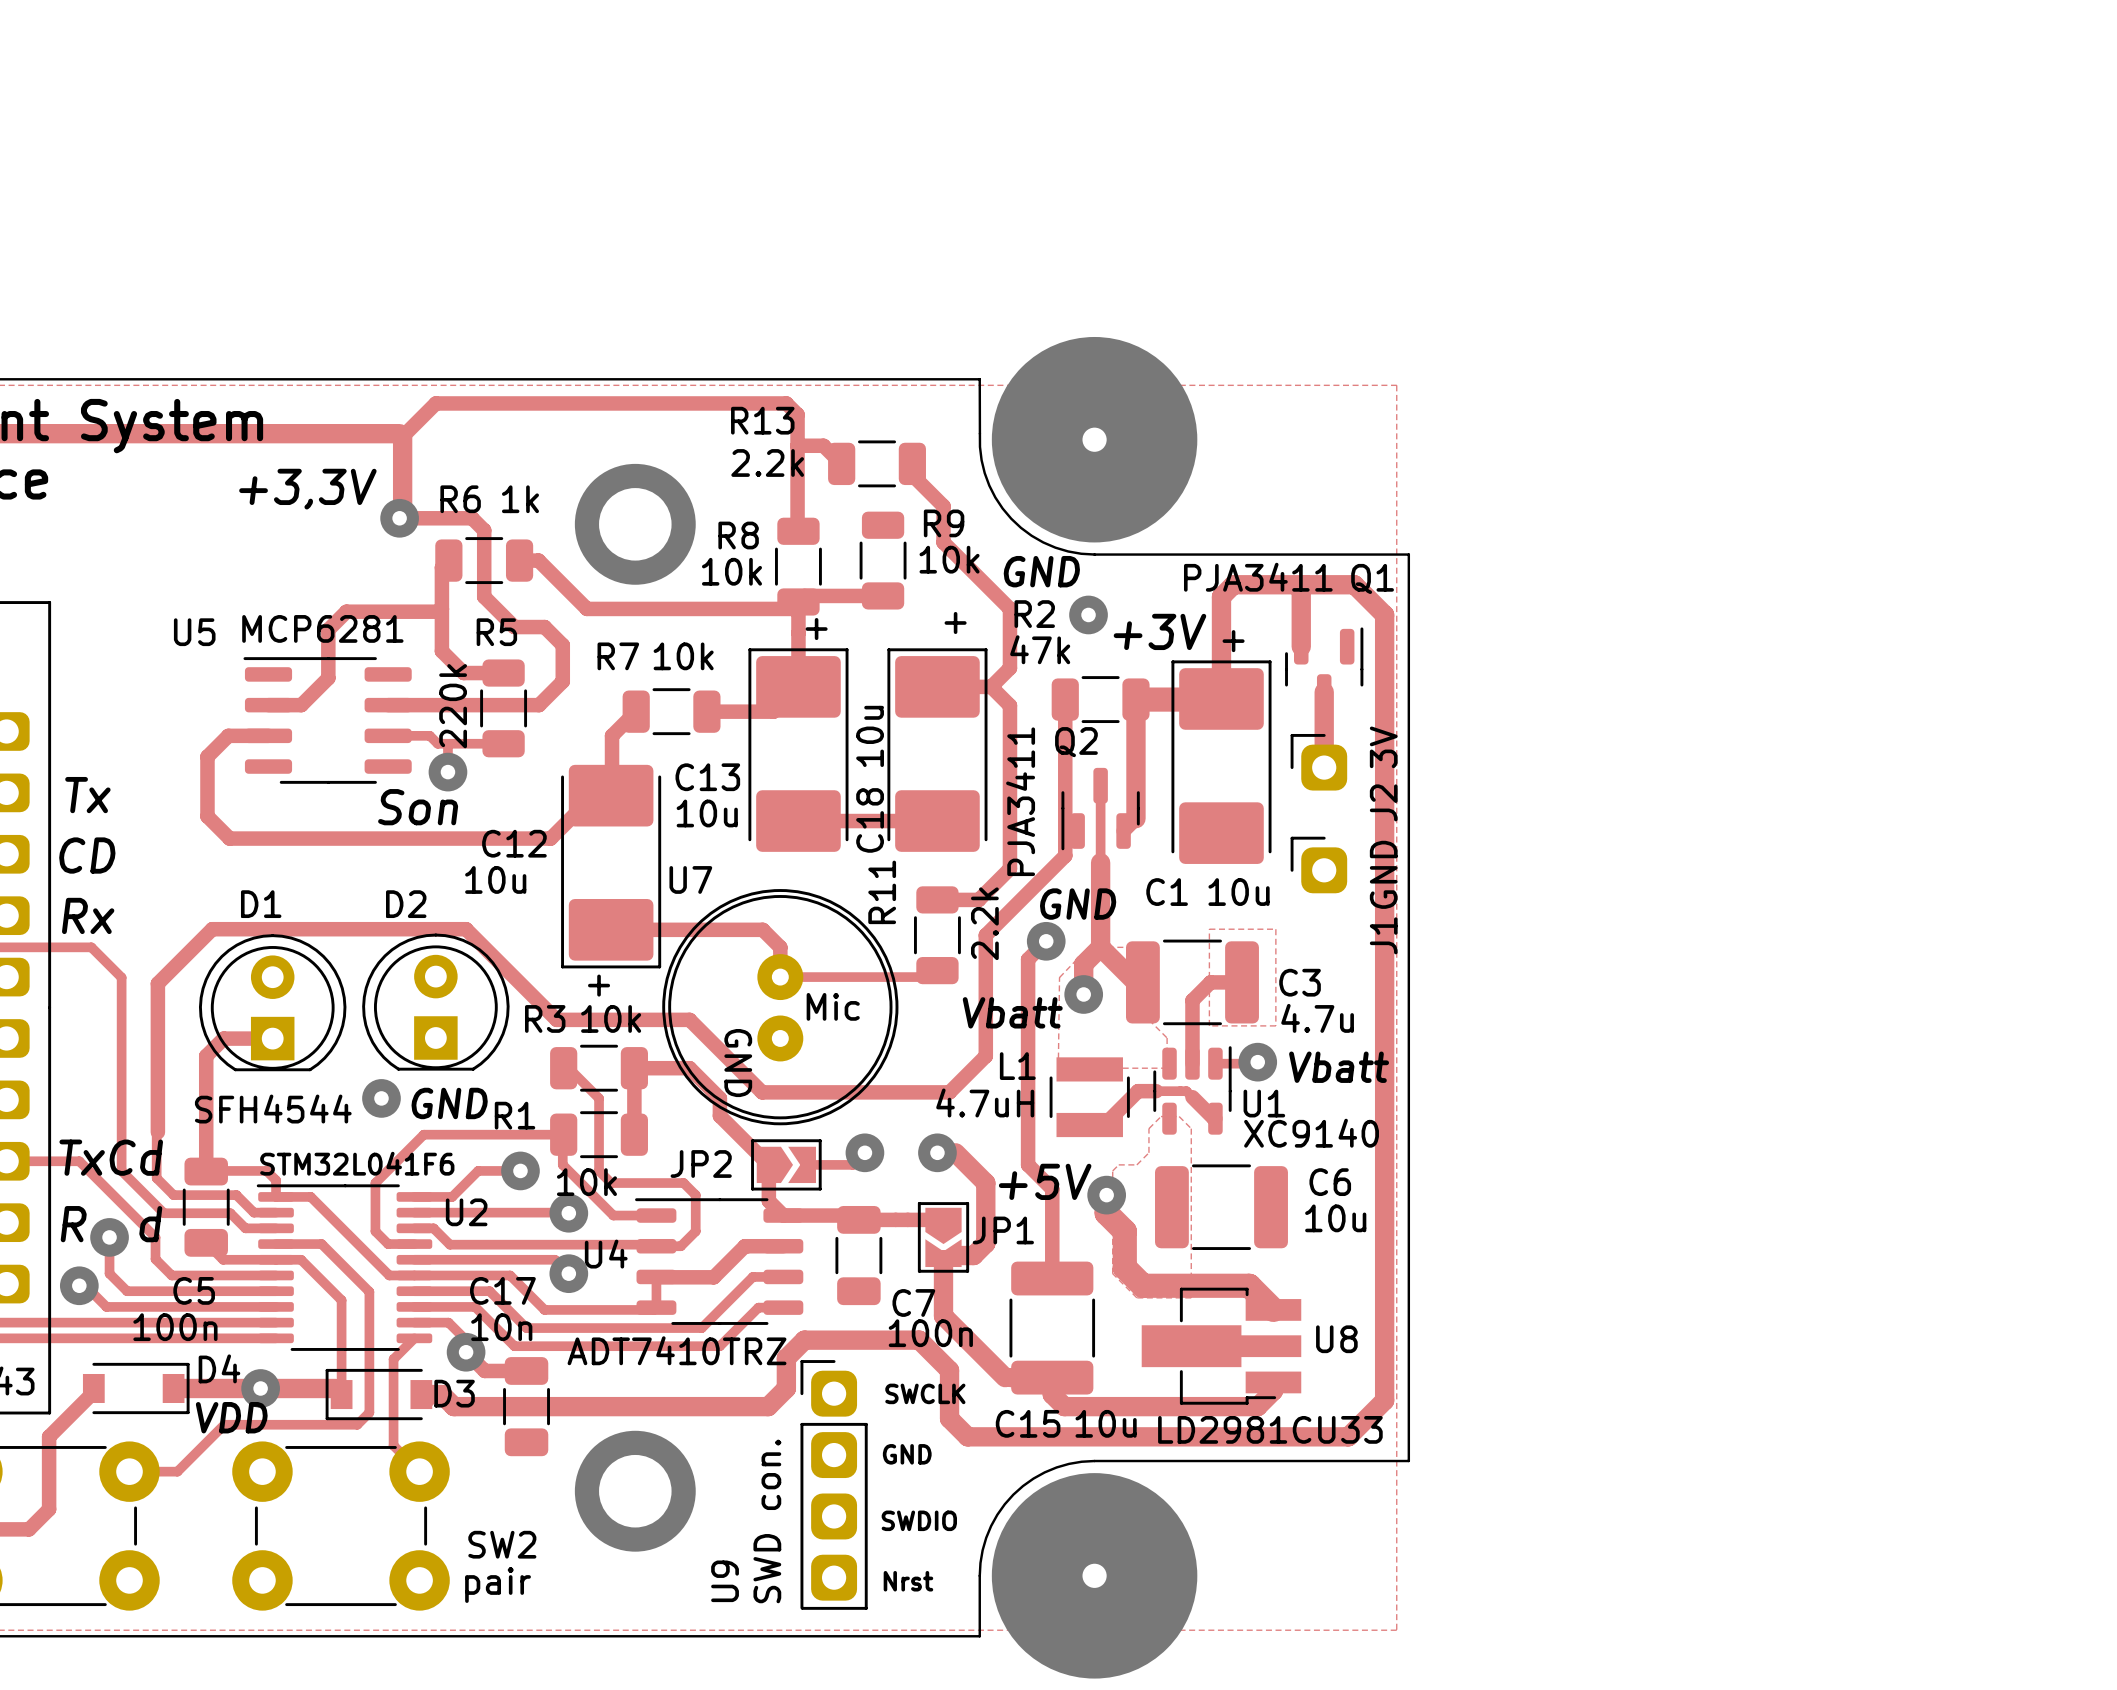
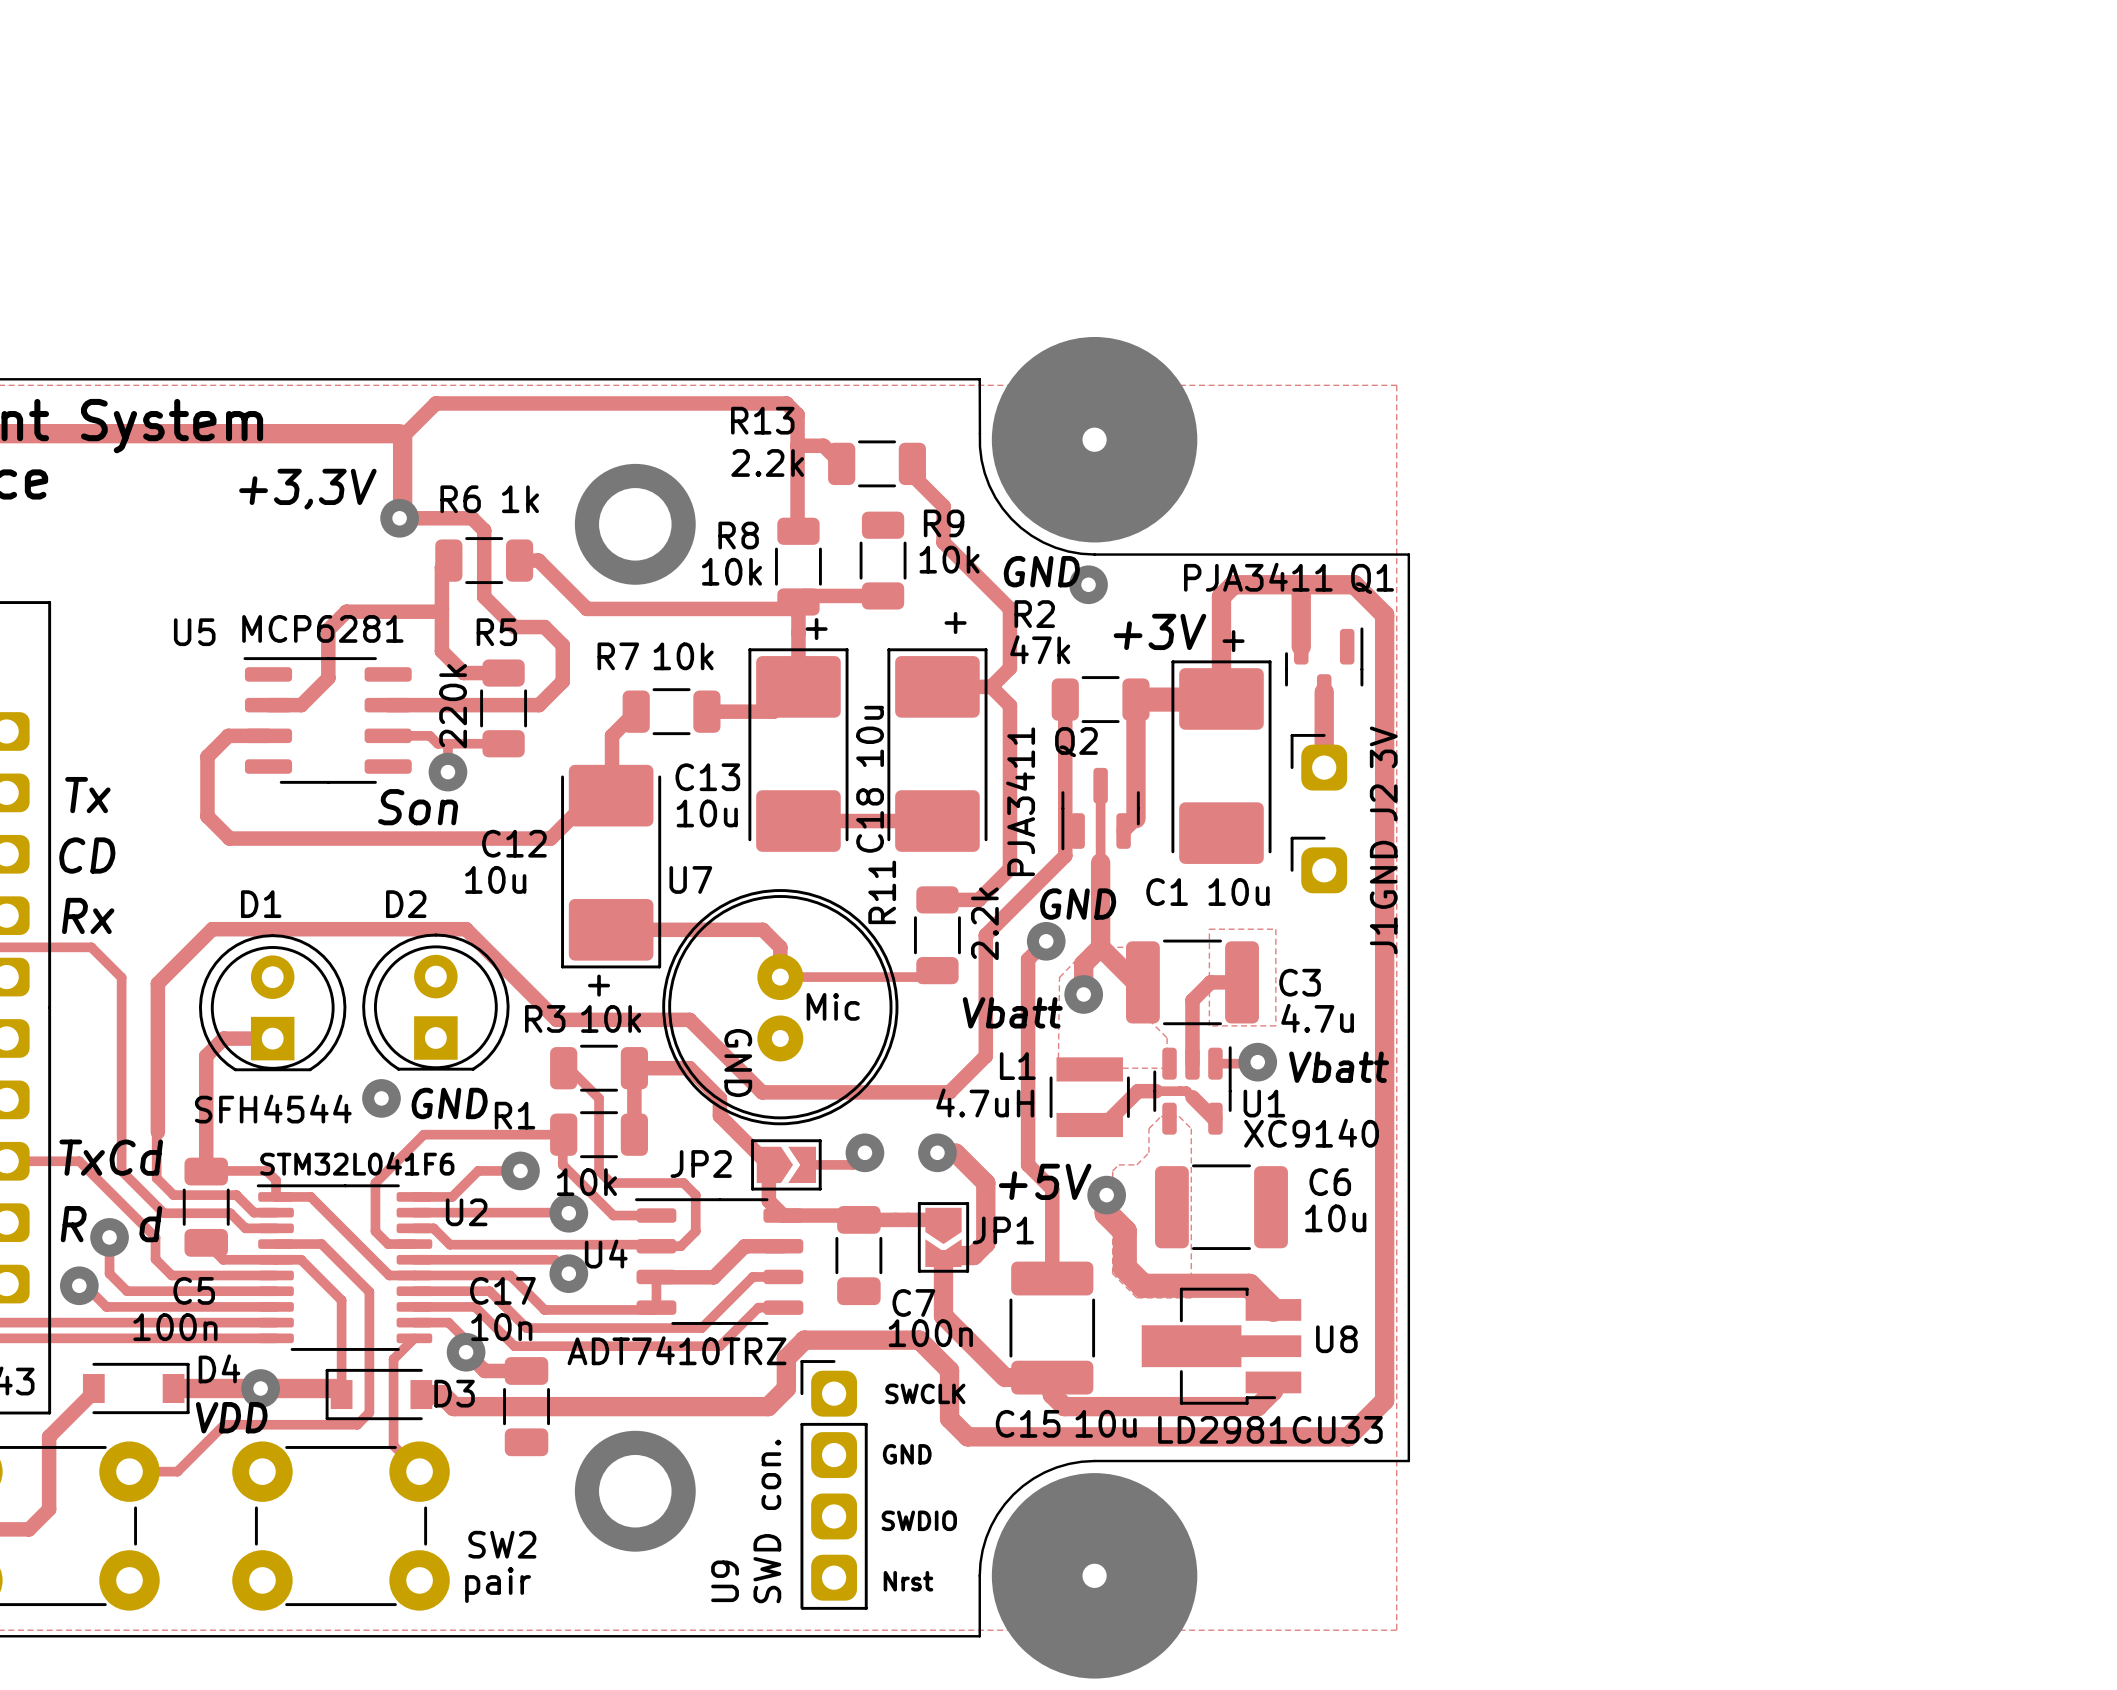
via position: (1088, 614) -> (1088, 584)

